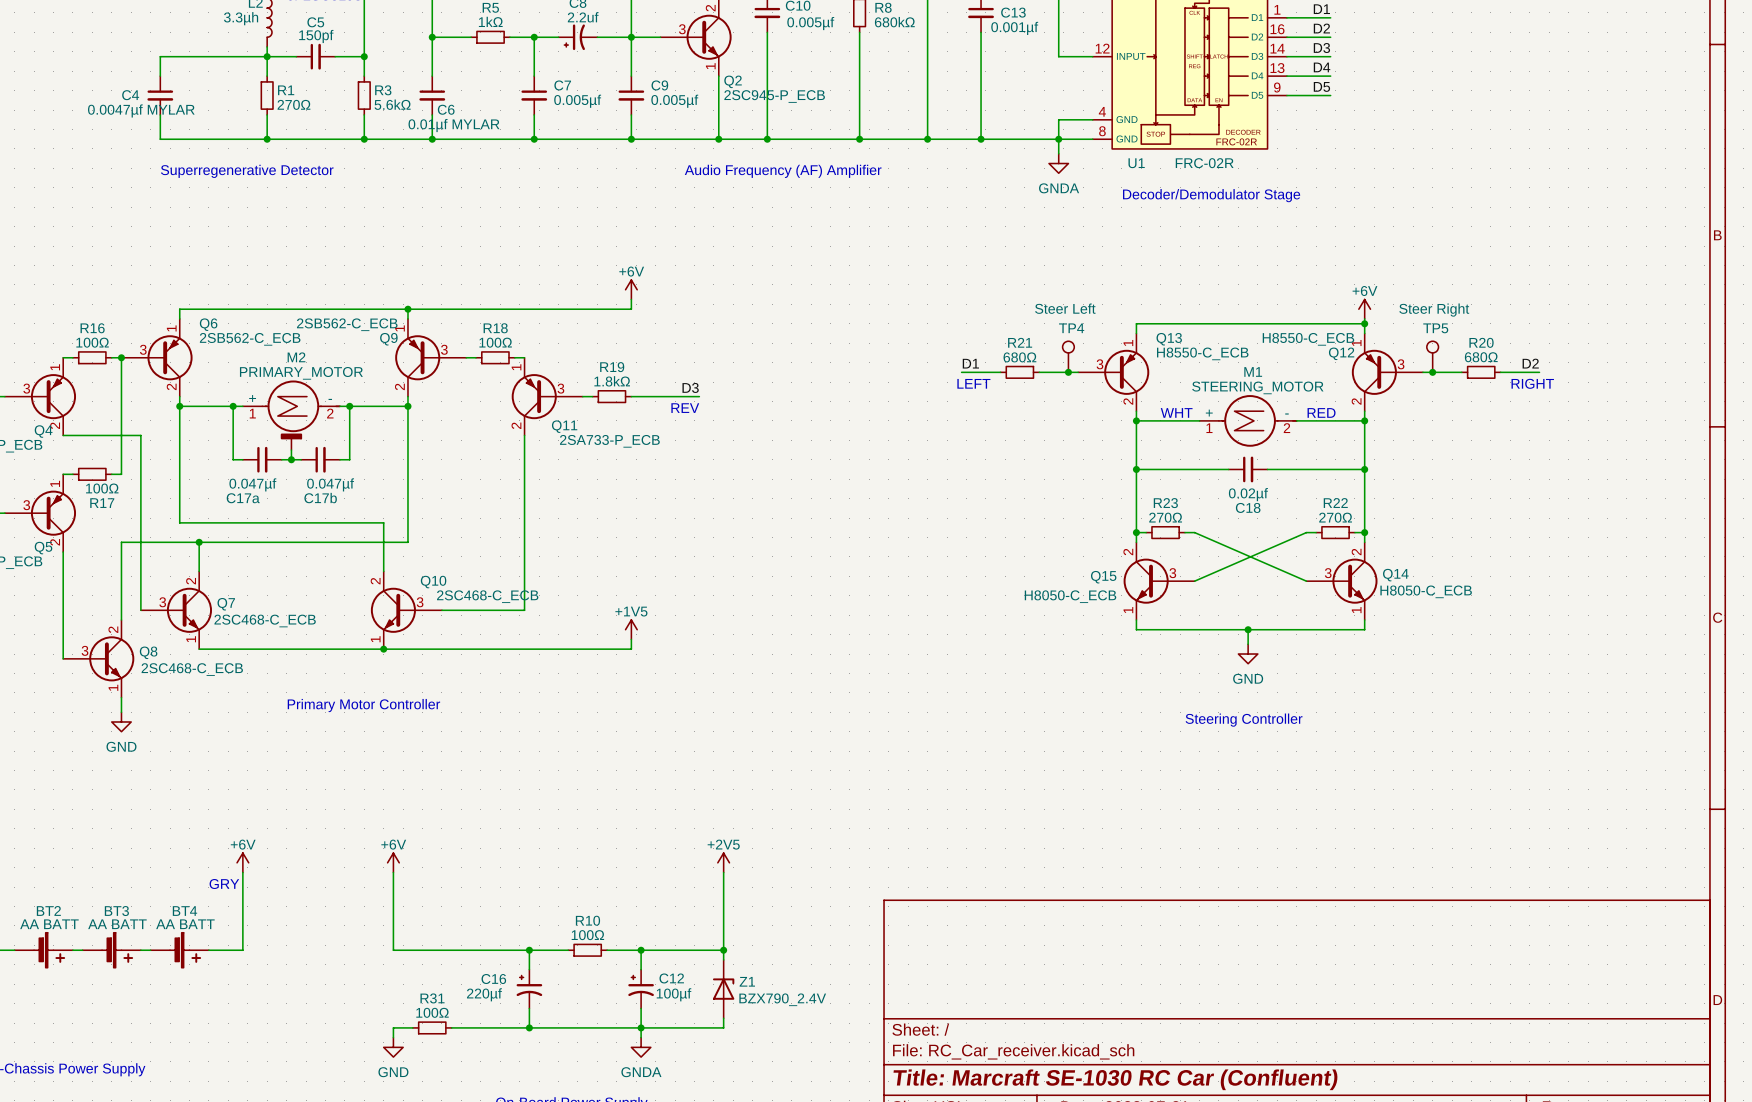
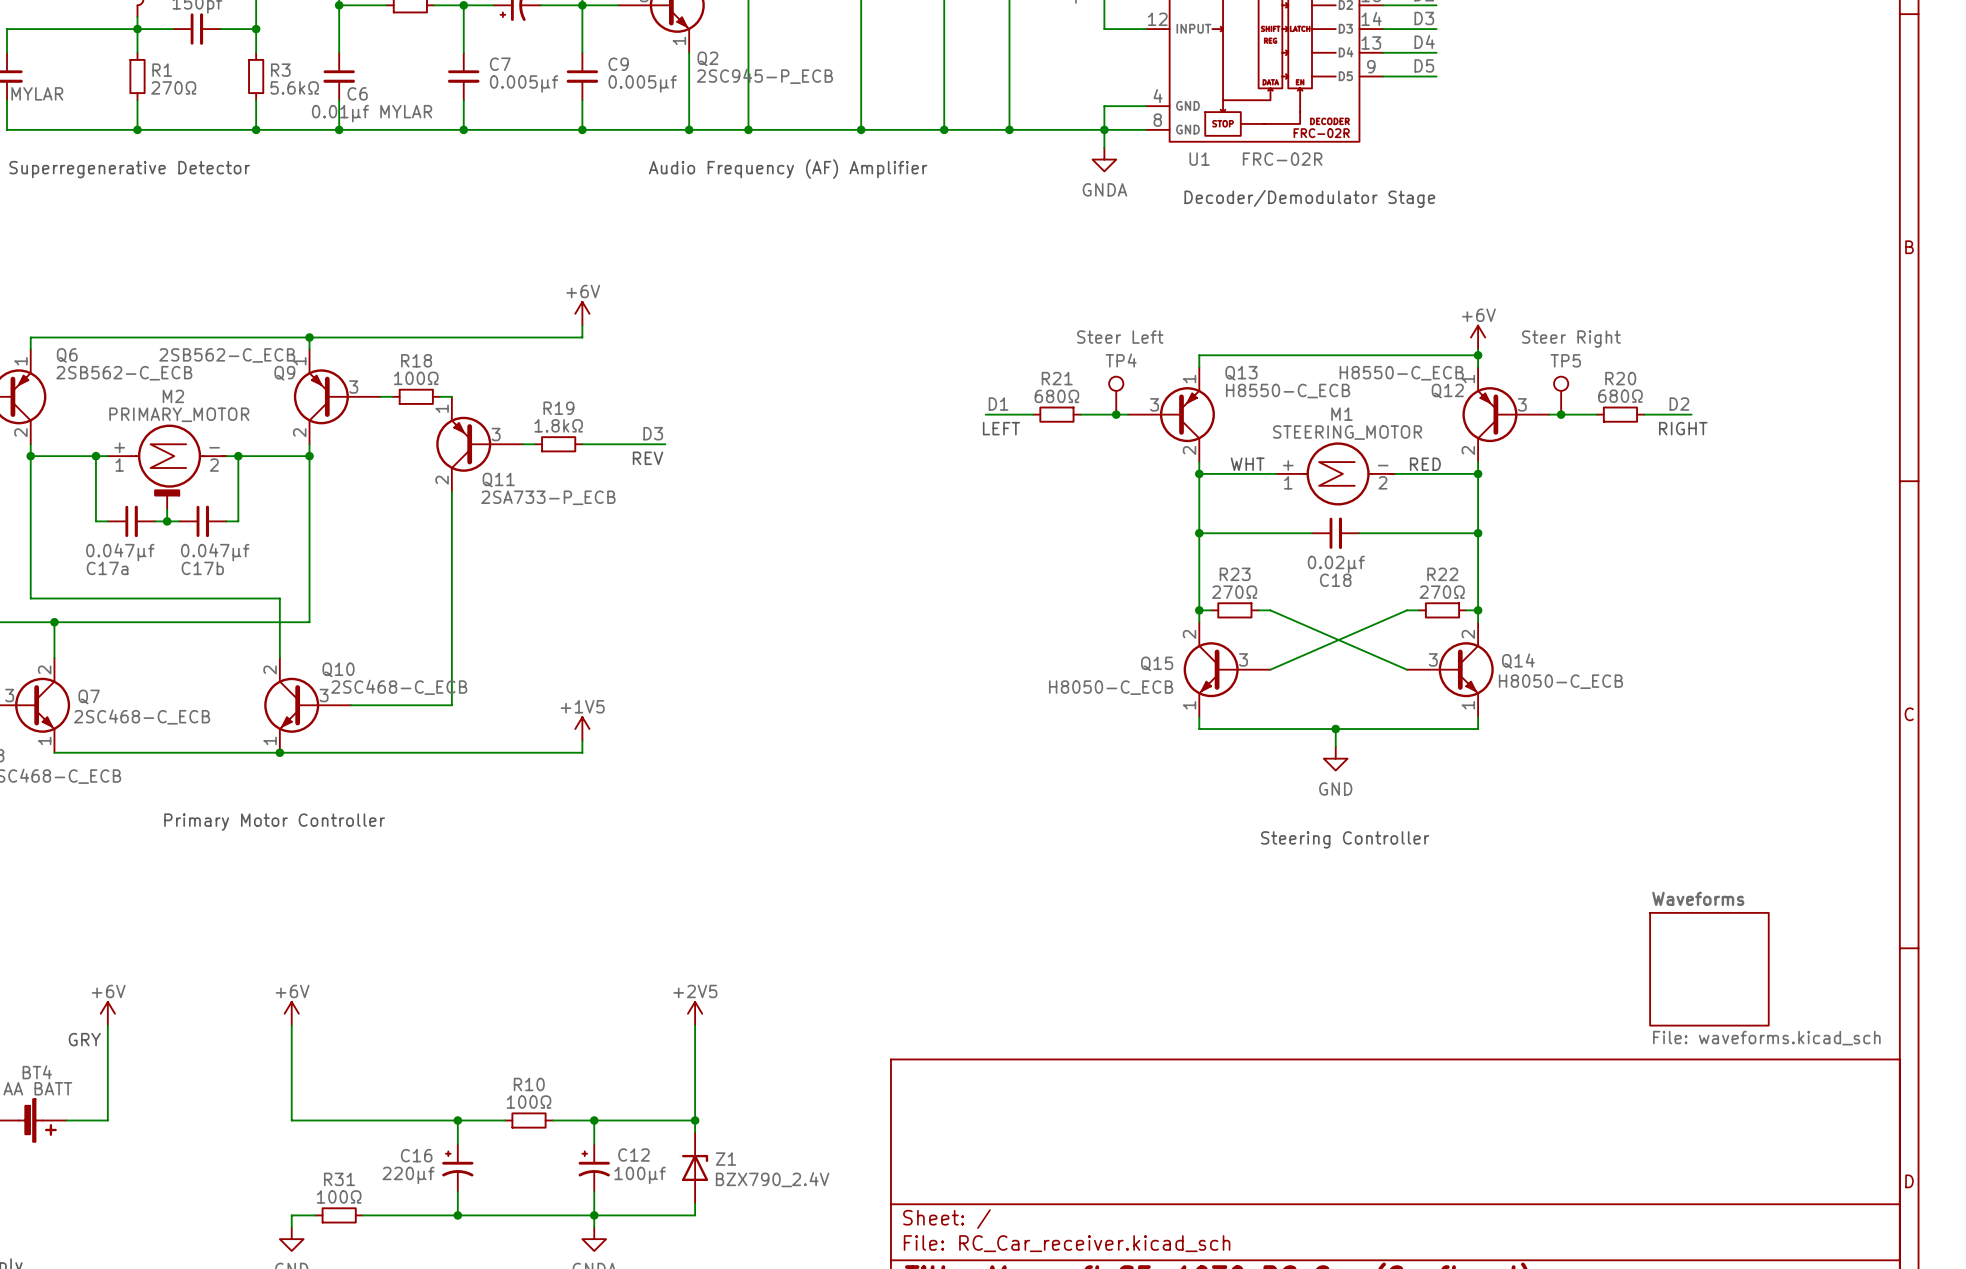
sheet Waveforms: none -> File: waveforms.kicad_sch (1709, 969)

